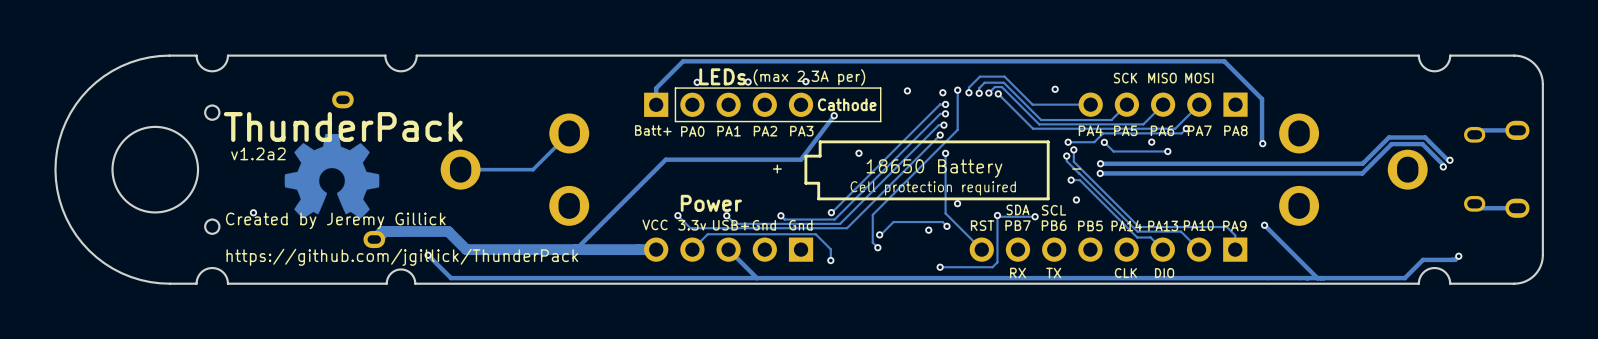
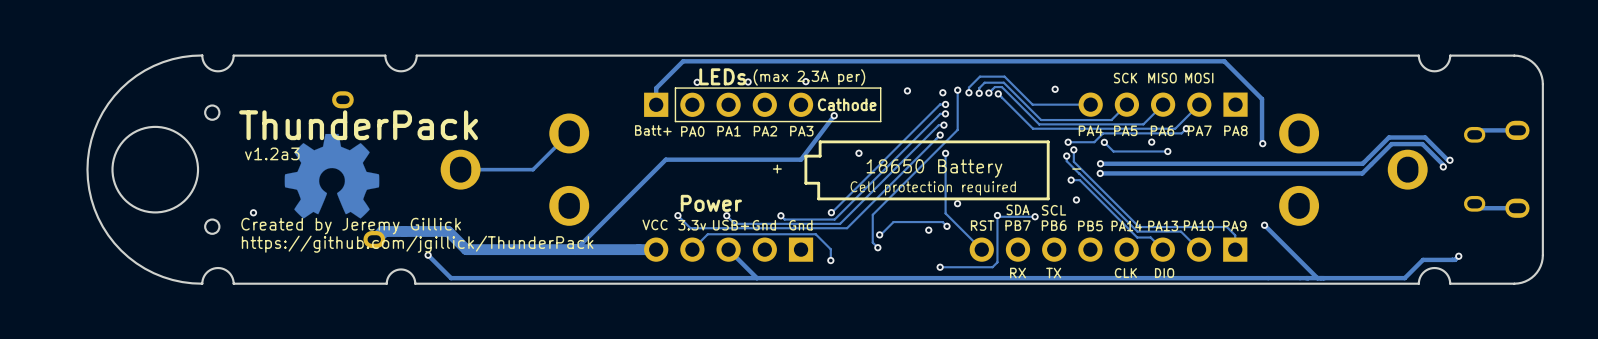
board edge: (233, 55) (227, 55) (224, 65) (214, 71) (202, 68) (198, 63) (196, 55) (159, 56) (130, 62) (103, 76) (88, 89) (70, 112) (59, 140) (55, 170) (59, 199) (70, 227) (82, 243) (104, 263) (131, 277) (160, 283) (196, 283) (198, 275) (202, 271) (214, 268) (224, 274) (227, 283) (233, 283) -> (233, 55) (229, 66) (221, 70) (214, 70) (207, 67) (202, 55) (192, 55) (163, 62) (144, 70) (128, 81) (114, 95) (98, 121) (89, 149) (87, 169) (91, 199) (98, 217) (108, 235) (128, 257) (153, 273) (172, 279) (192, 283) (202, 283) (204, 275) (208, 271) (215, 268) (222, 268) (230, 274) (233, 283)
text position: ThunderPack (343, 127) -> ThunderPack (358, 125)
text: v1.2a2 (258, 153) -> v1.2a3 (272, 153)
text position: Created by Jeremy Gillick (335, 220) -> Created by Jeremy Gillick (351, 226)
text position: https://github.com/jgillick/ThunderPack (402, 257) -> https://github.com/jgillick/ThunderPack (417, 244)

